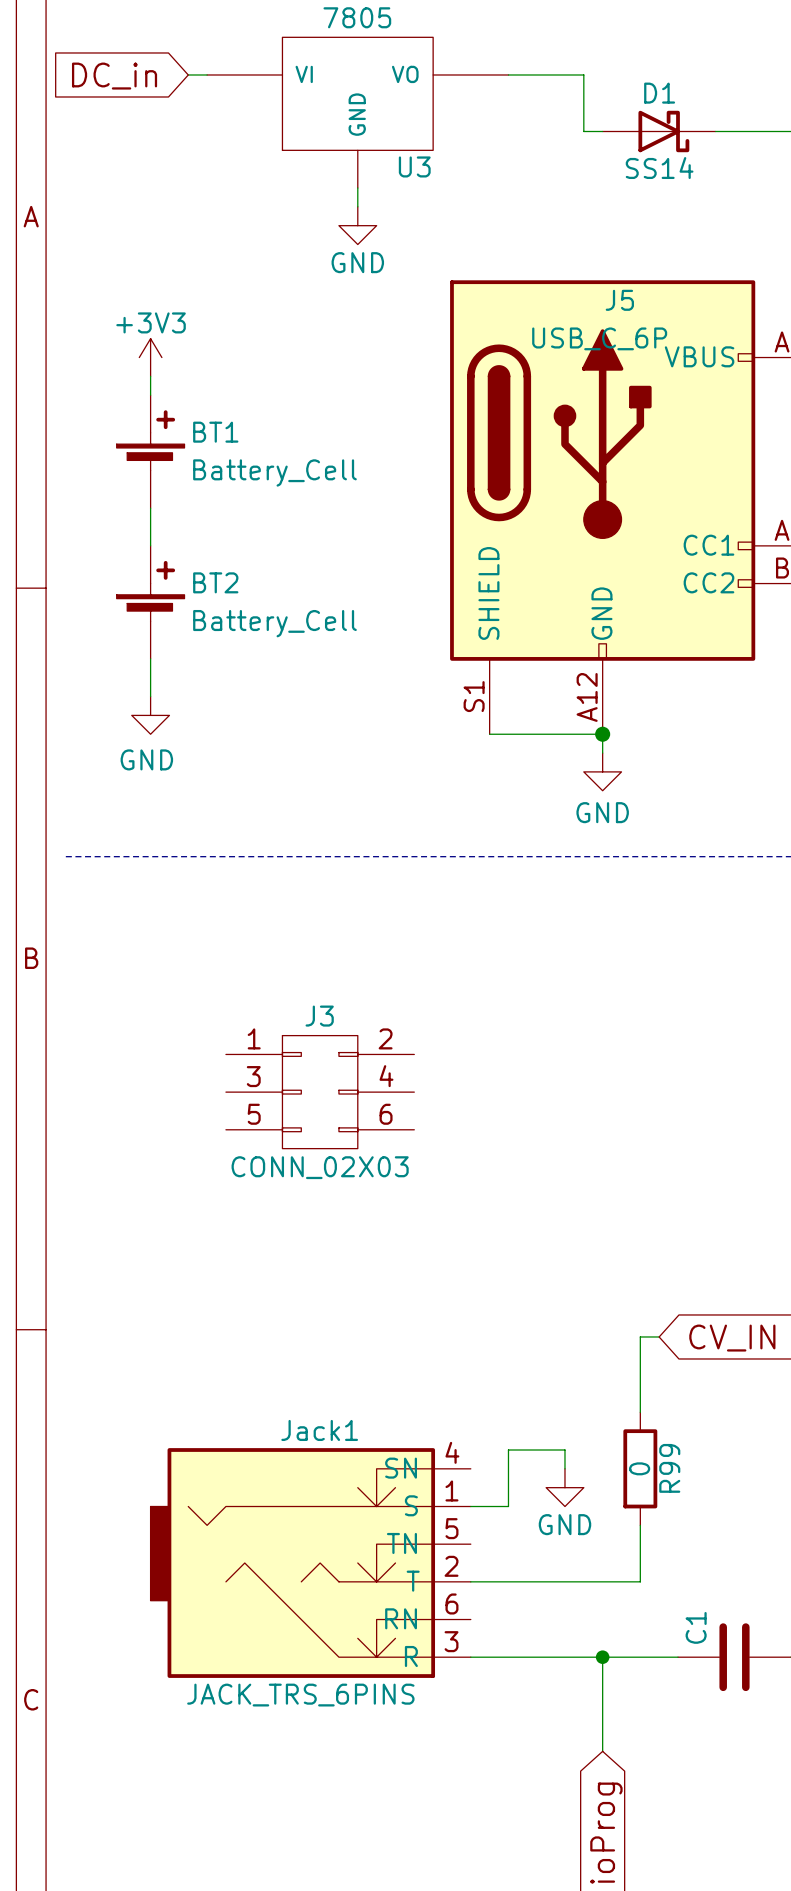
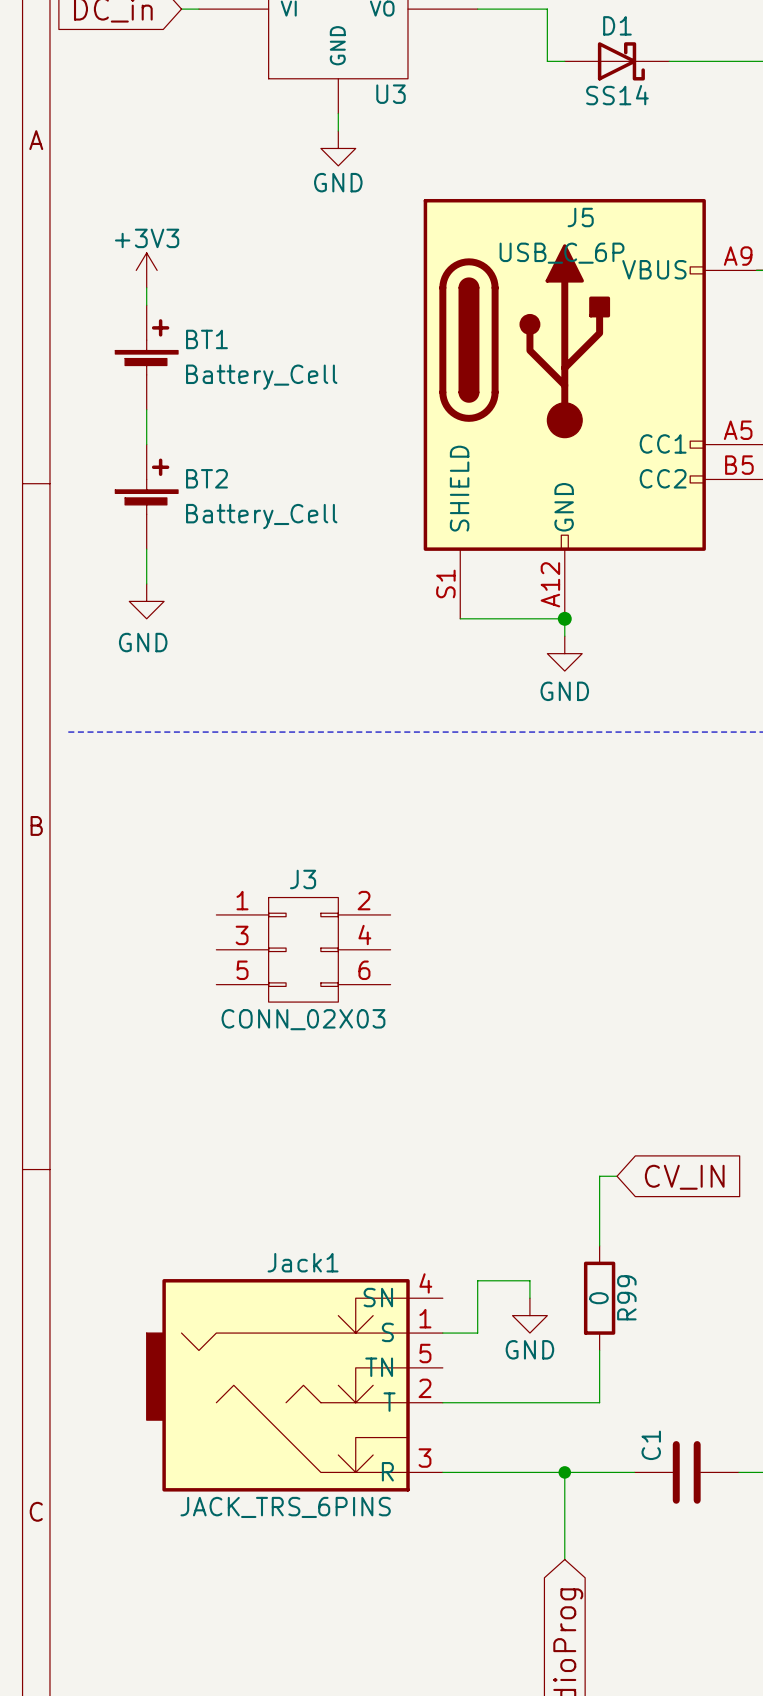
Jack1 symbol: [150, 1448, 471, 1678] -> [146, 1279, 443, 1492]

